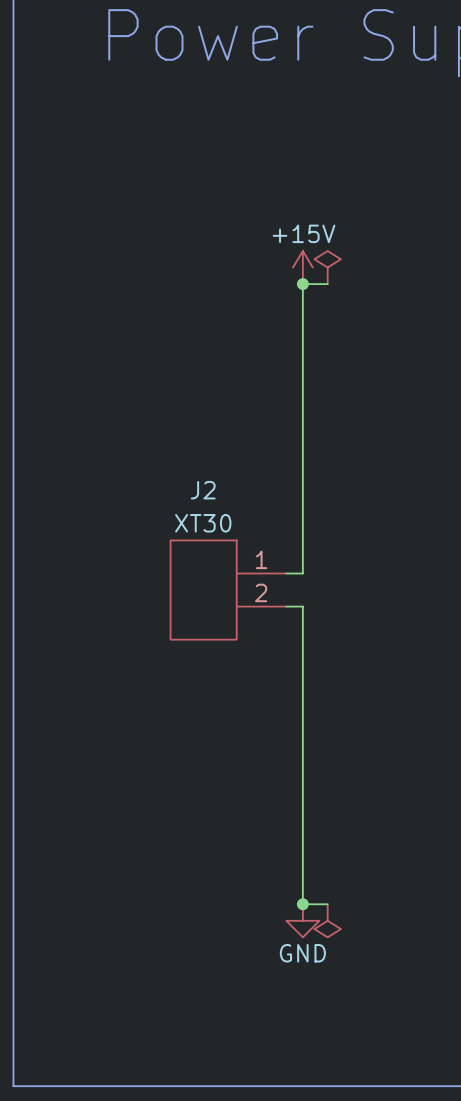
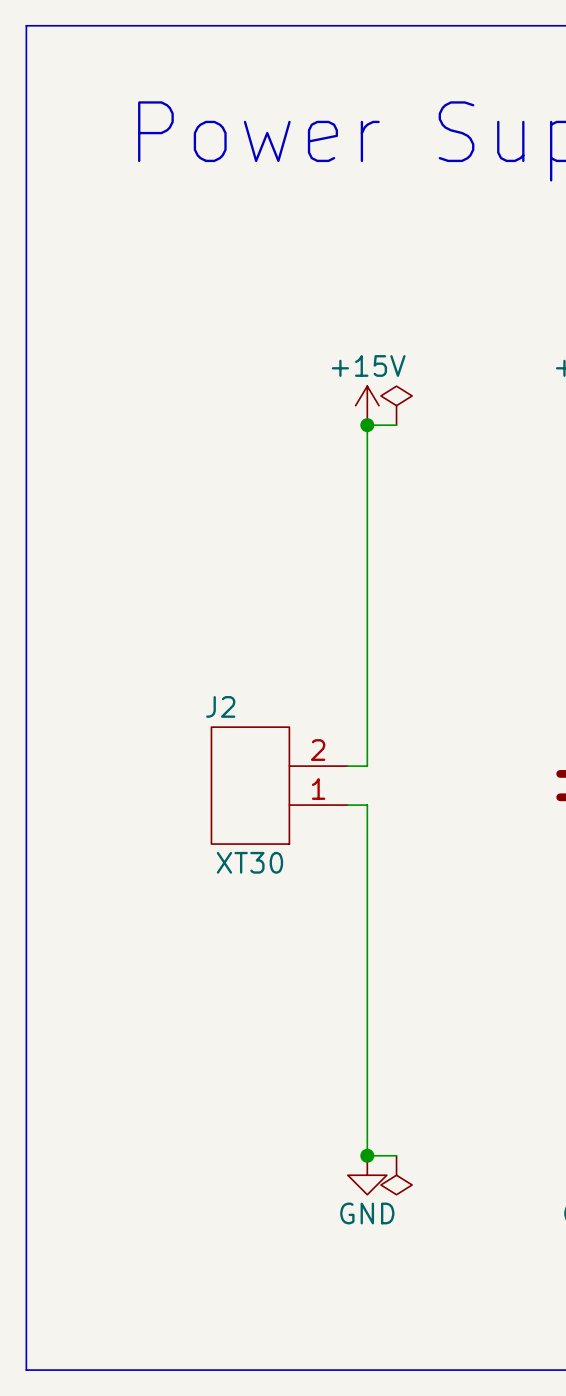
J2 name position: J2 (203, 490) -> J2 (220, 706)
J2 flip: as is (203, 590) -> up-down (250, 785)

